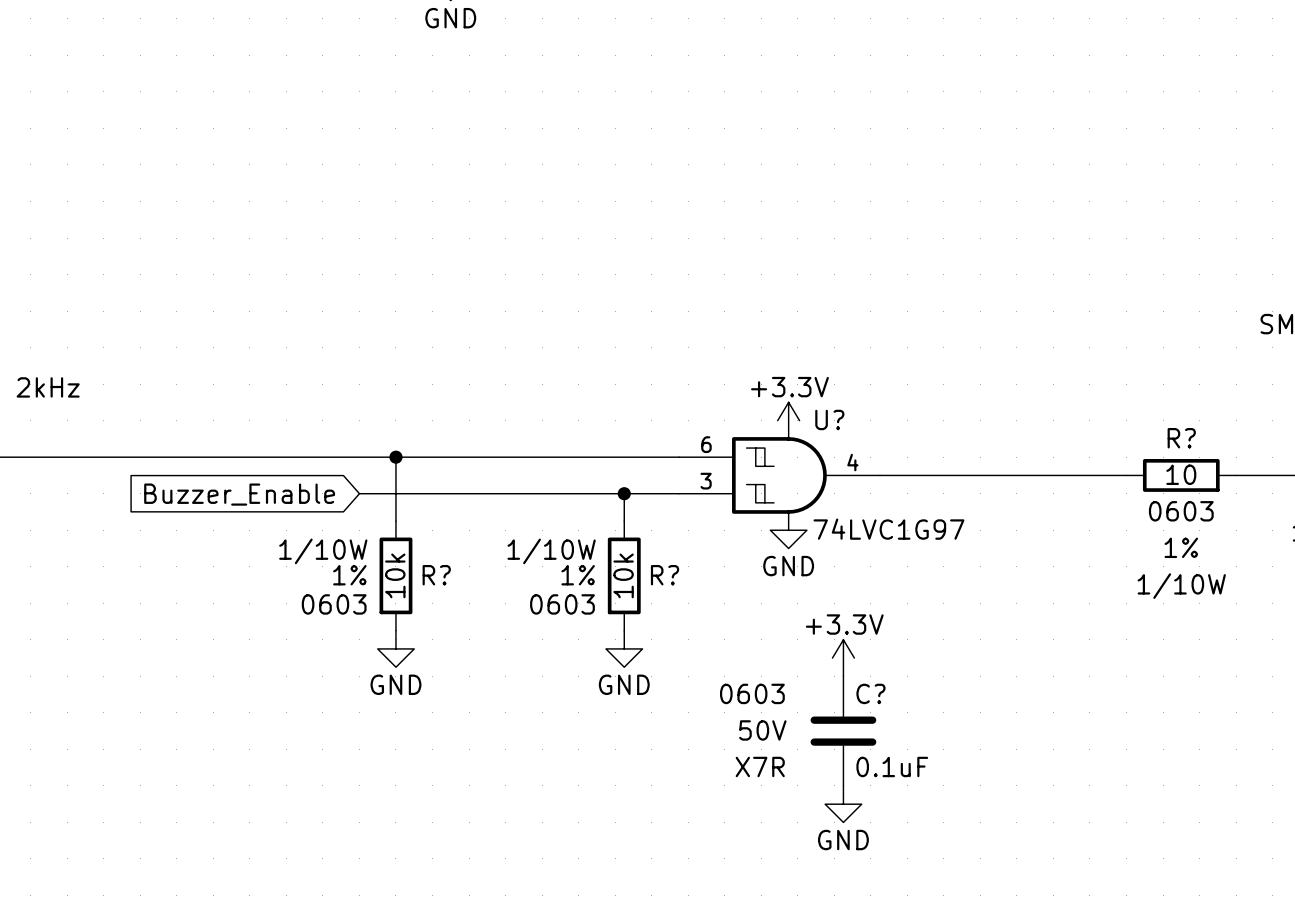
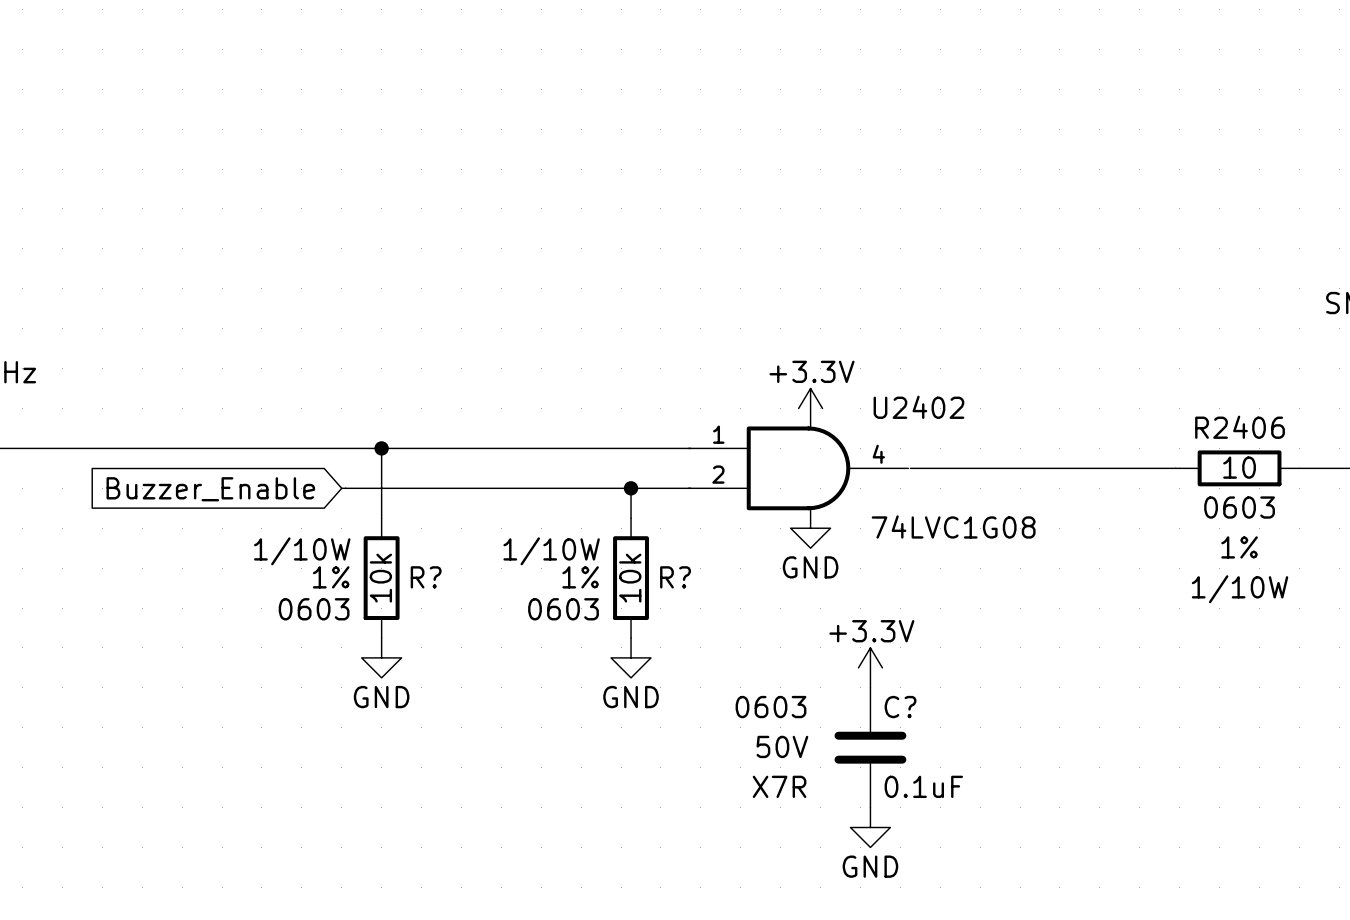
R? name: R? (1181, 438) -> R2406 (1240, 427)
U2402: none -> 74LVC1G08 (798, 468)
U?: 74LVC1G97 (779, 475) -> none

